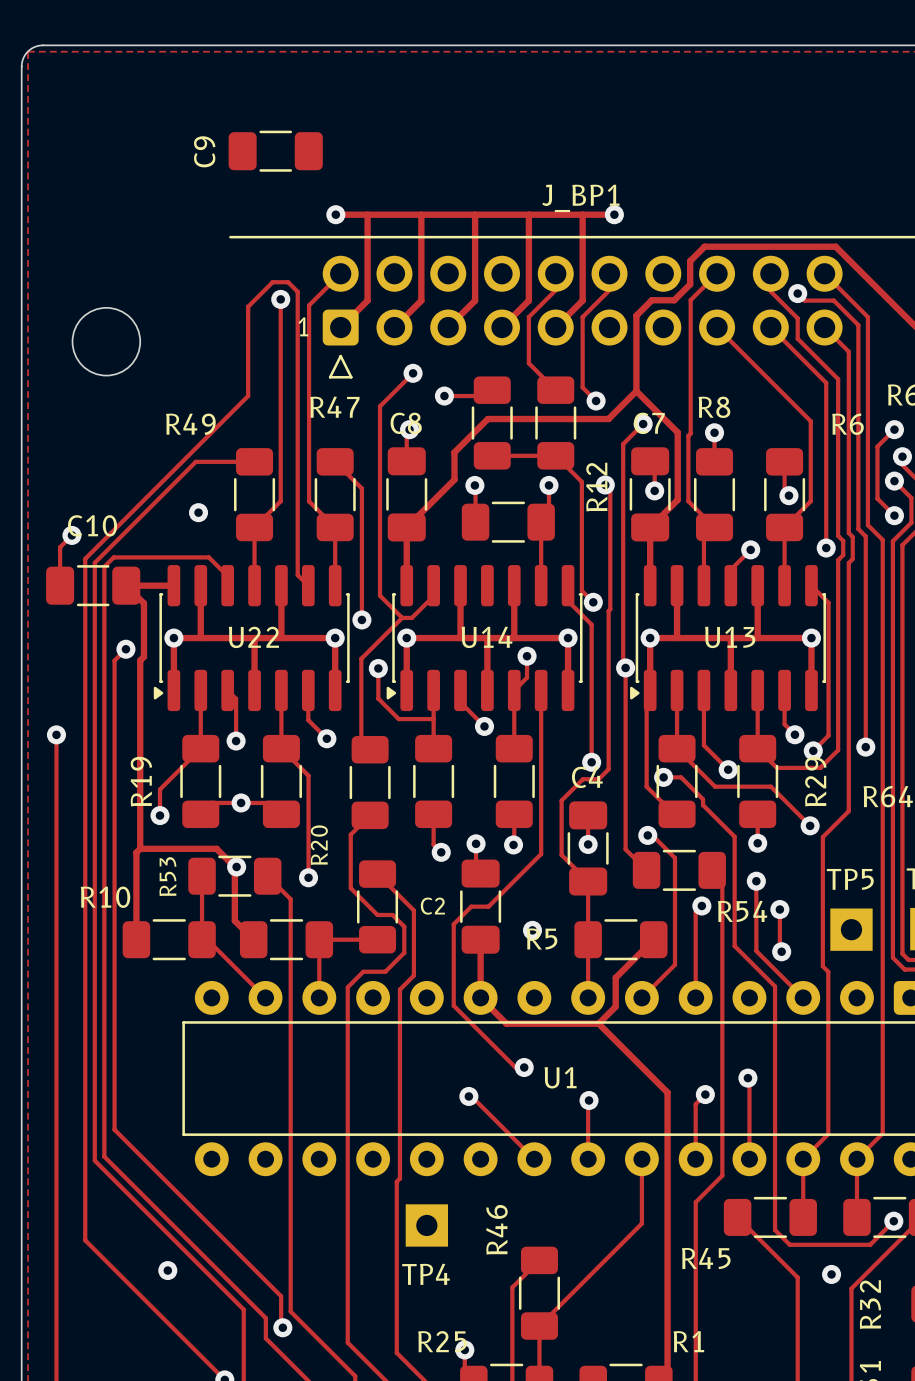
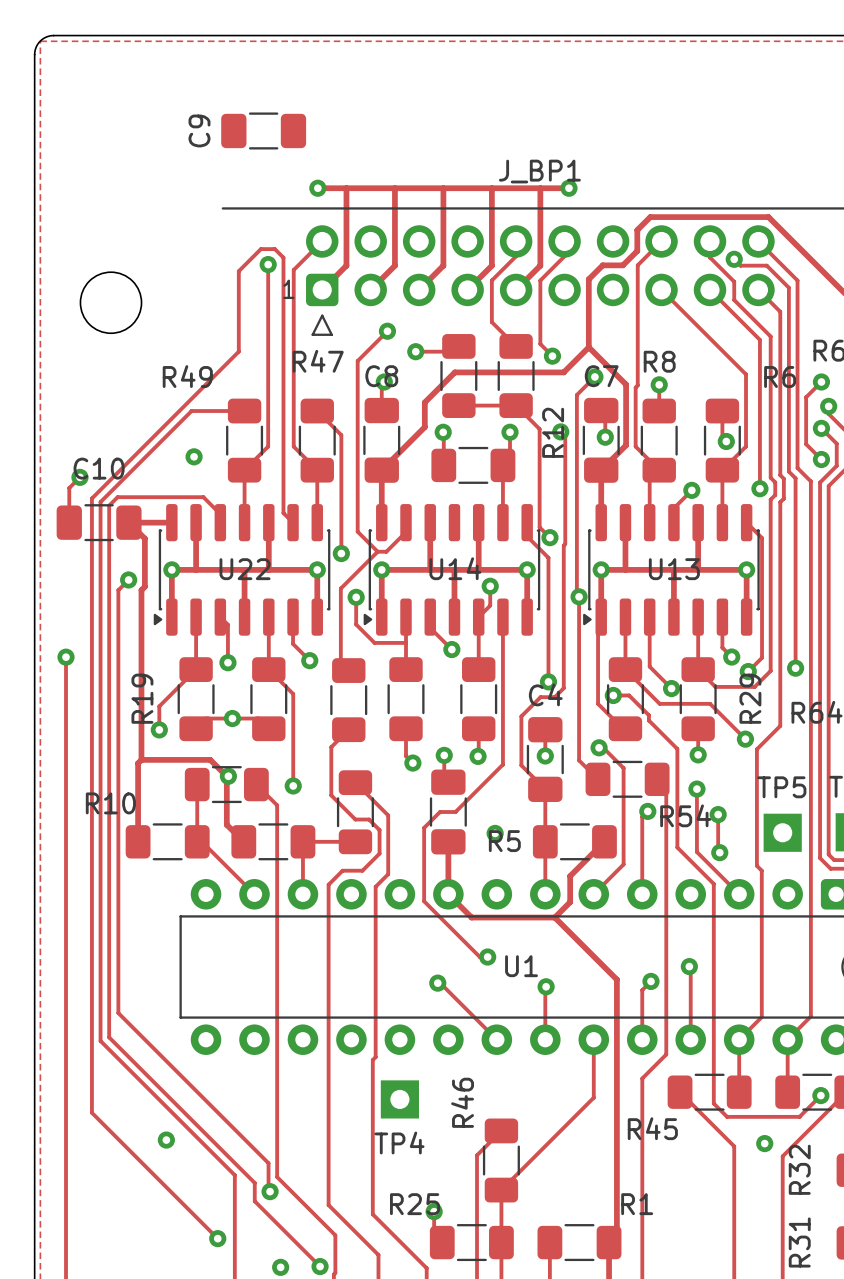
R20 name: R20 (319, 845) -> none
R53 name: R53 (167, 876) -> none
C2 name: C2 (432, 906) -> none

